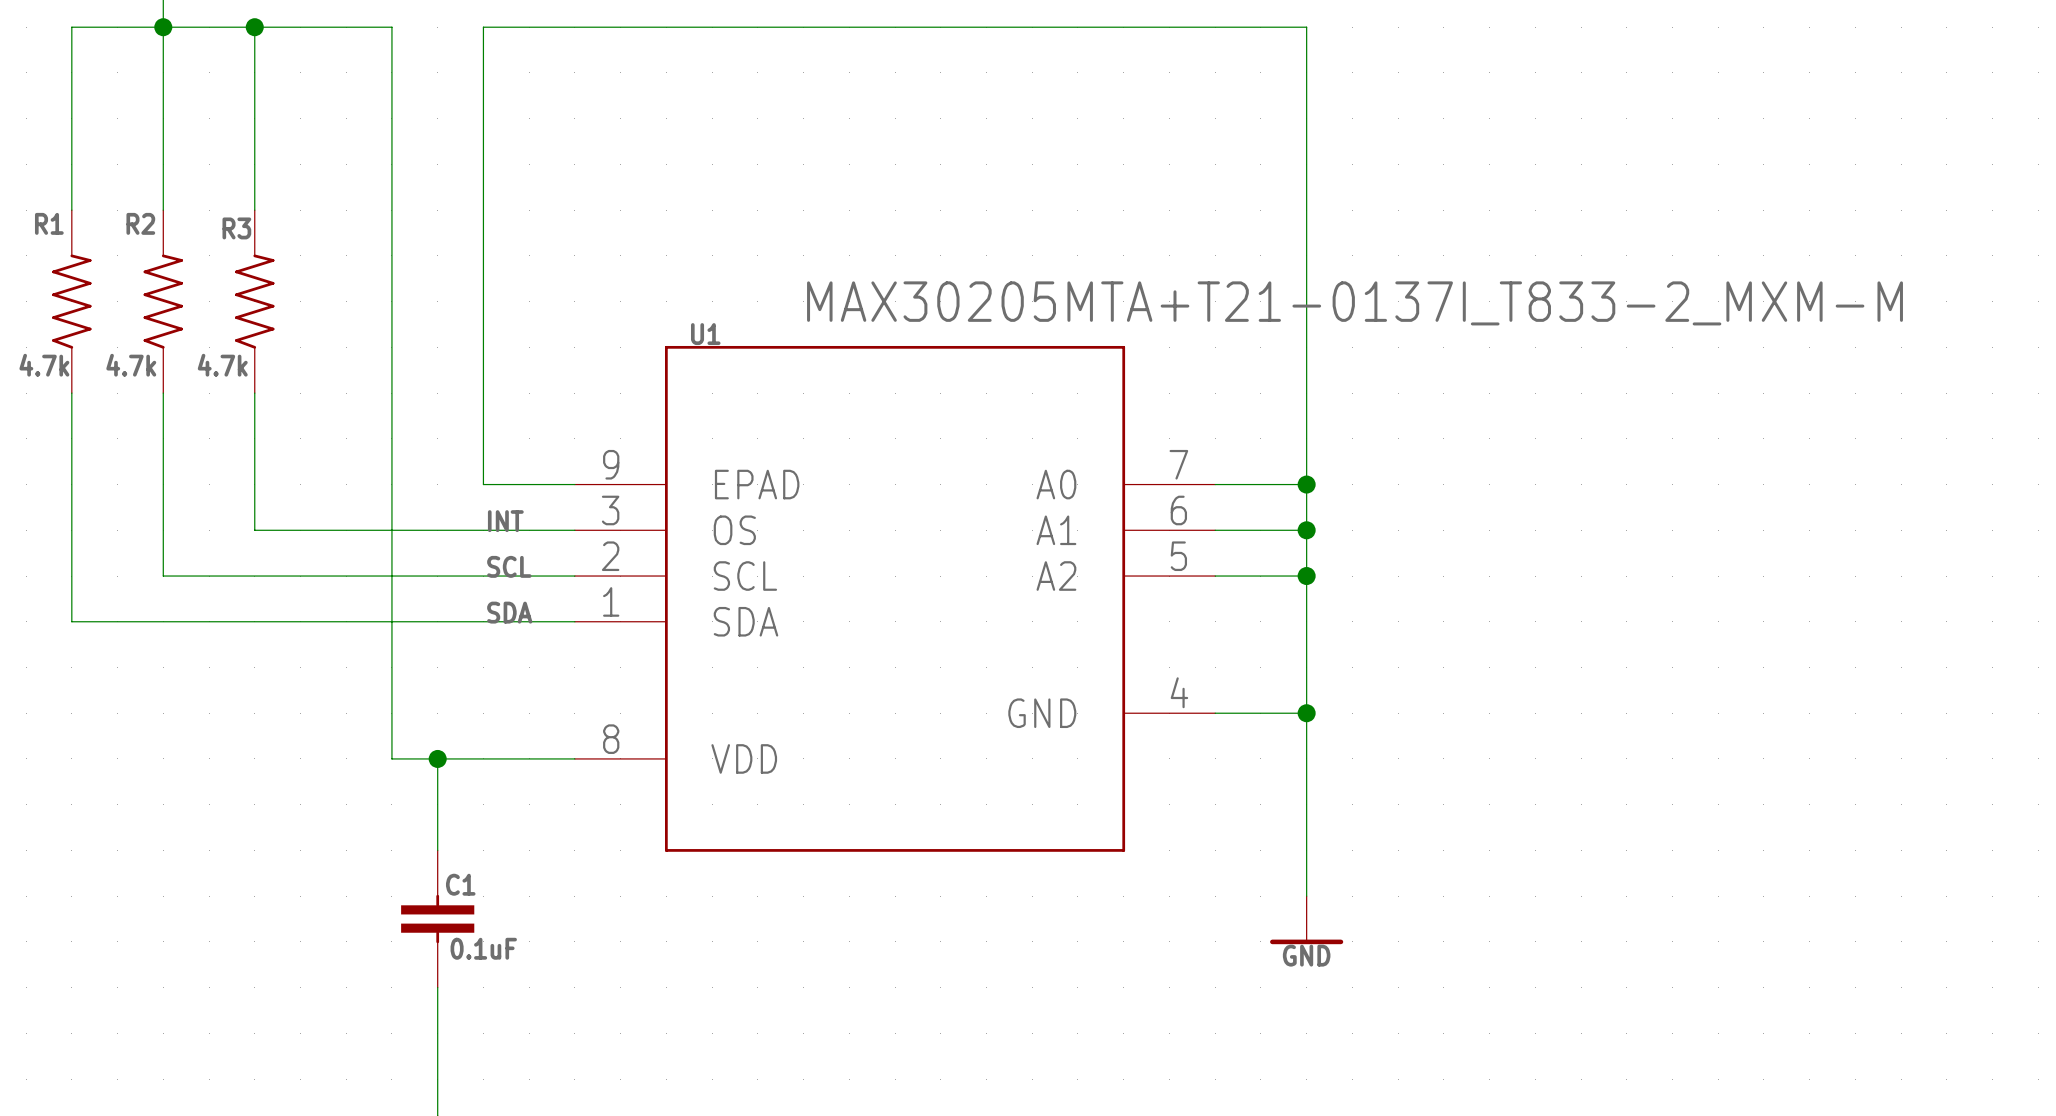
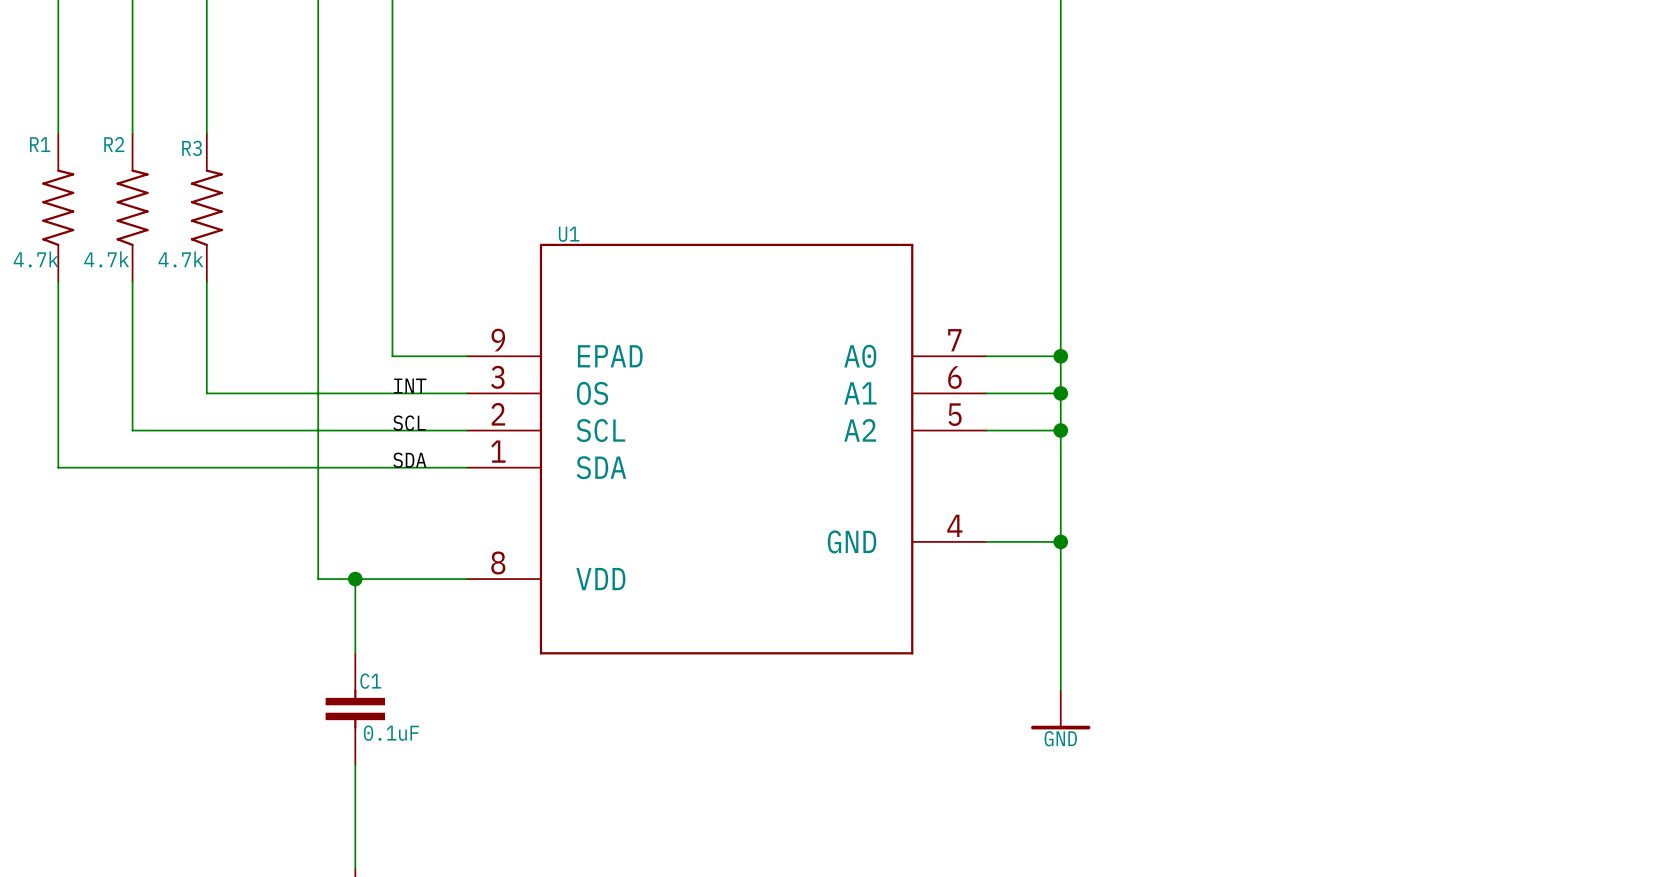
U1 value: MAX30205MTA+T21-0137I_T833-2_MXM-M (1355, 303) -> none

